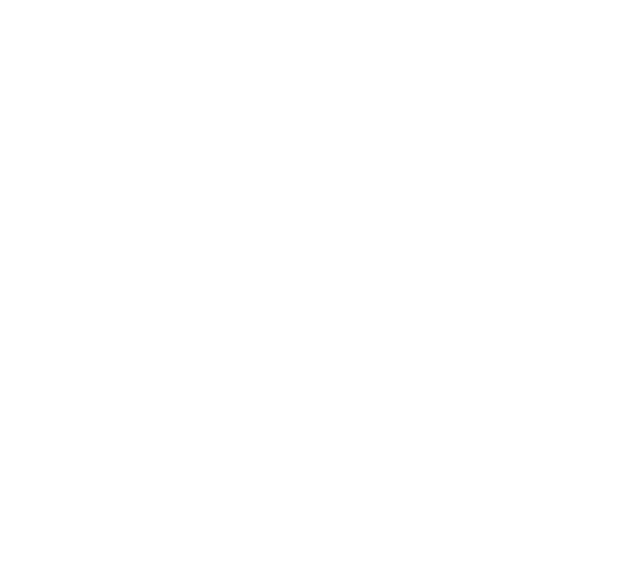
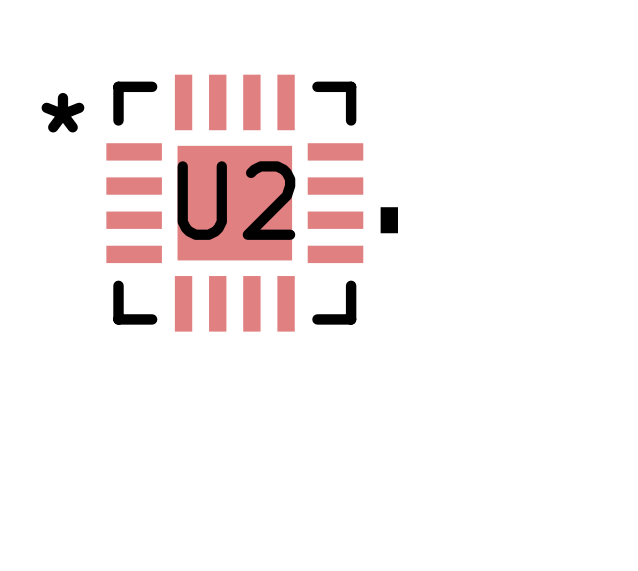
U2: none -> (252, 203)

